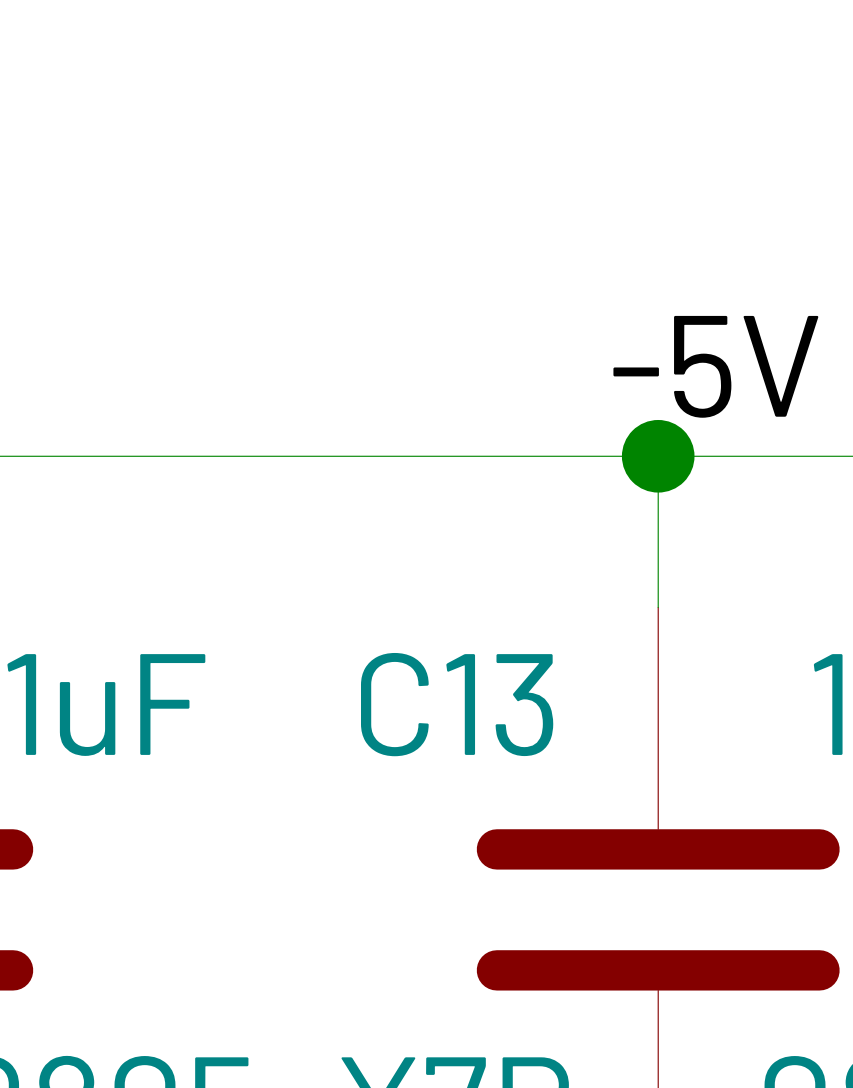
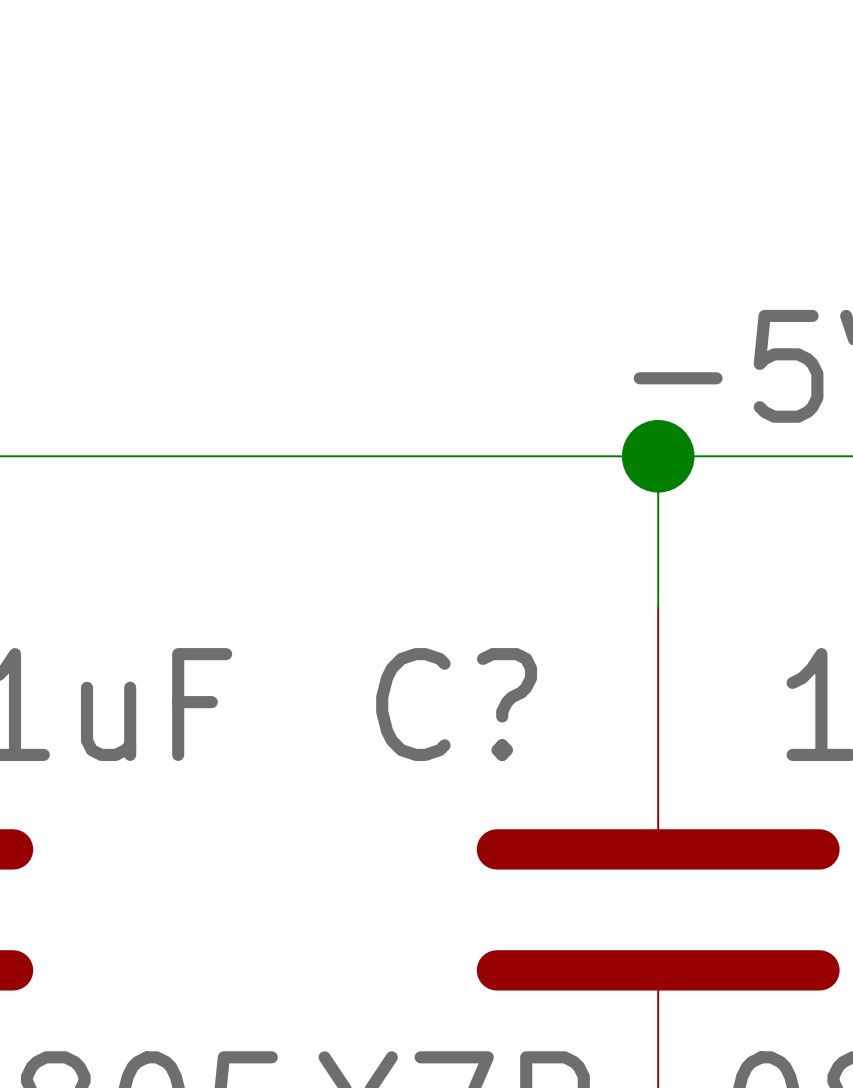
C13 name: C13 (457, 704) -> C? (456, 704)

